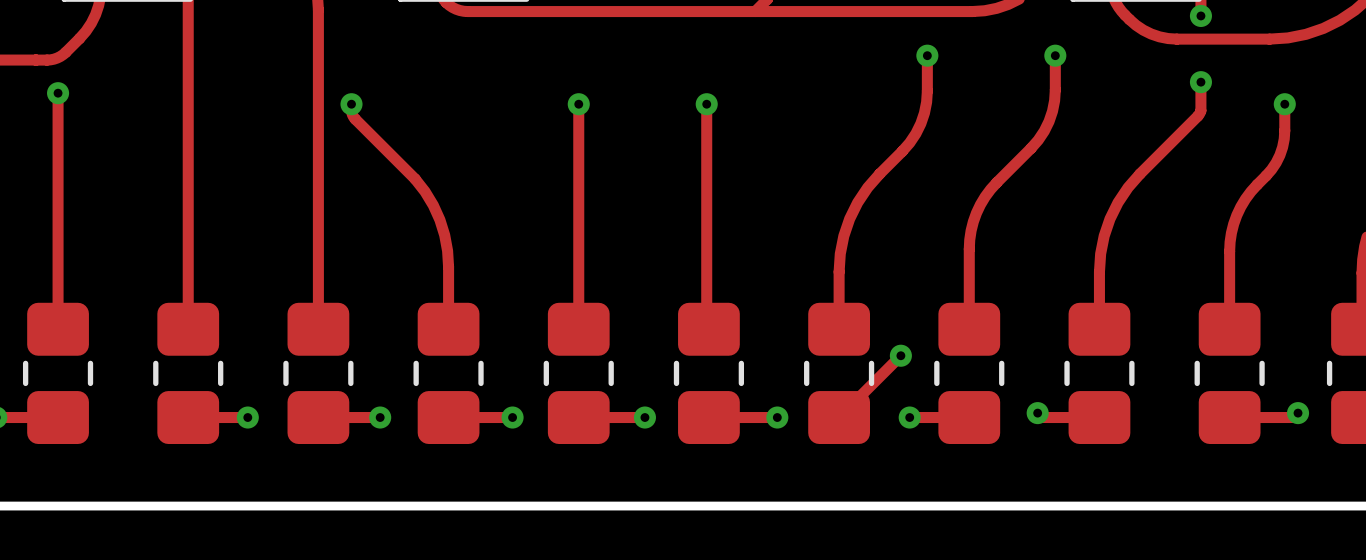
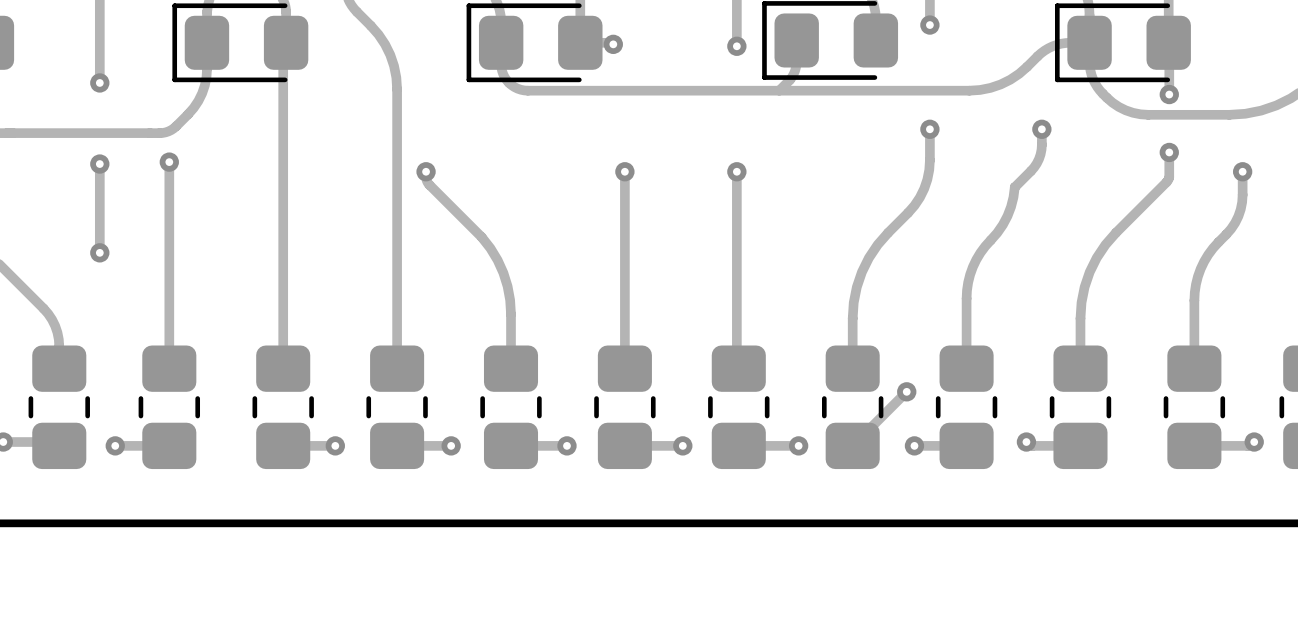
track: (1055, 73) (1054, 100) (1044, 131) (1031, 148) (996, 182) -> (1014, 187) (1007, 216) (990, 240)
track: none -> (1041, 144) (1036, 163) (1014, 187)

